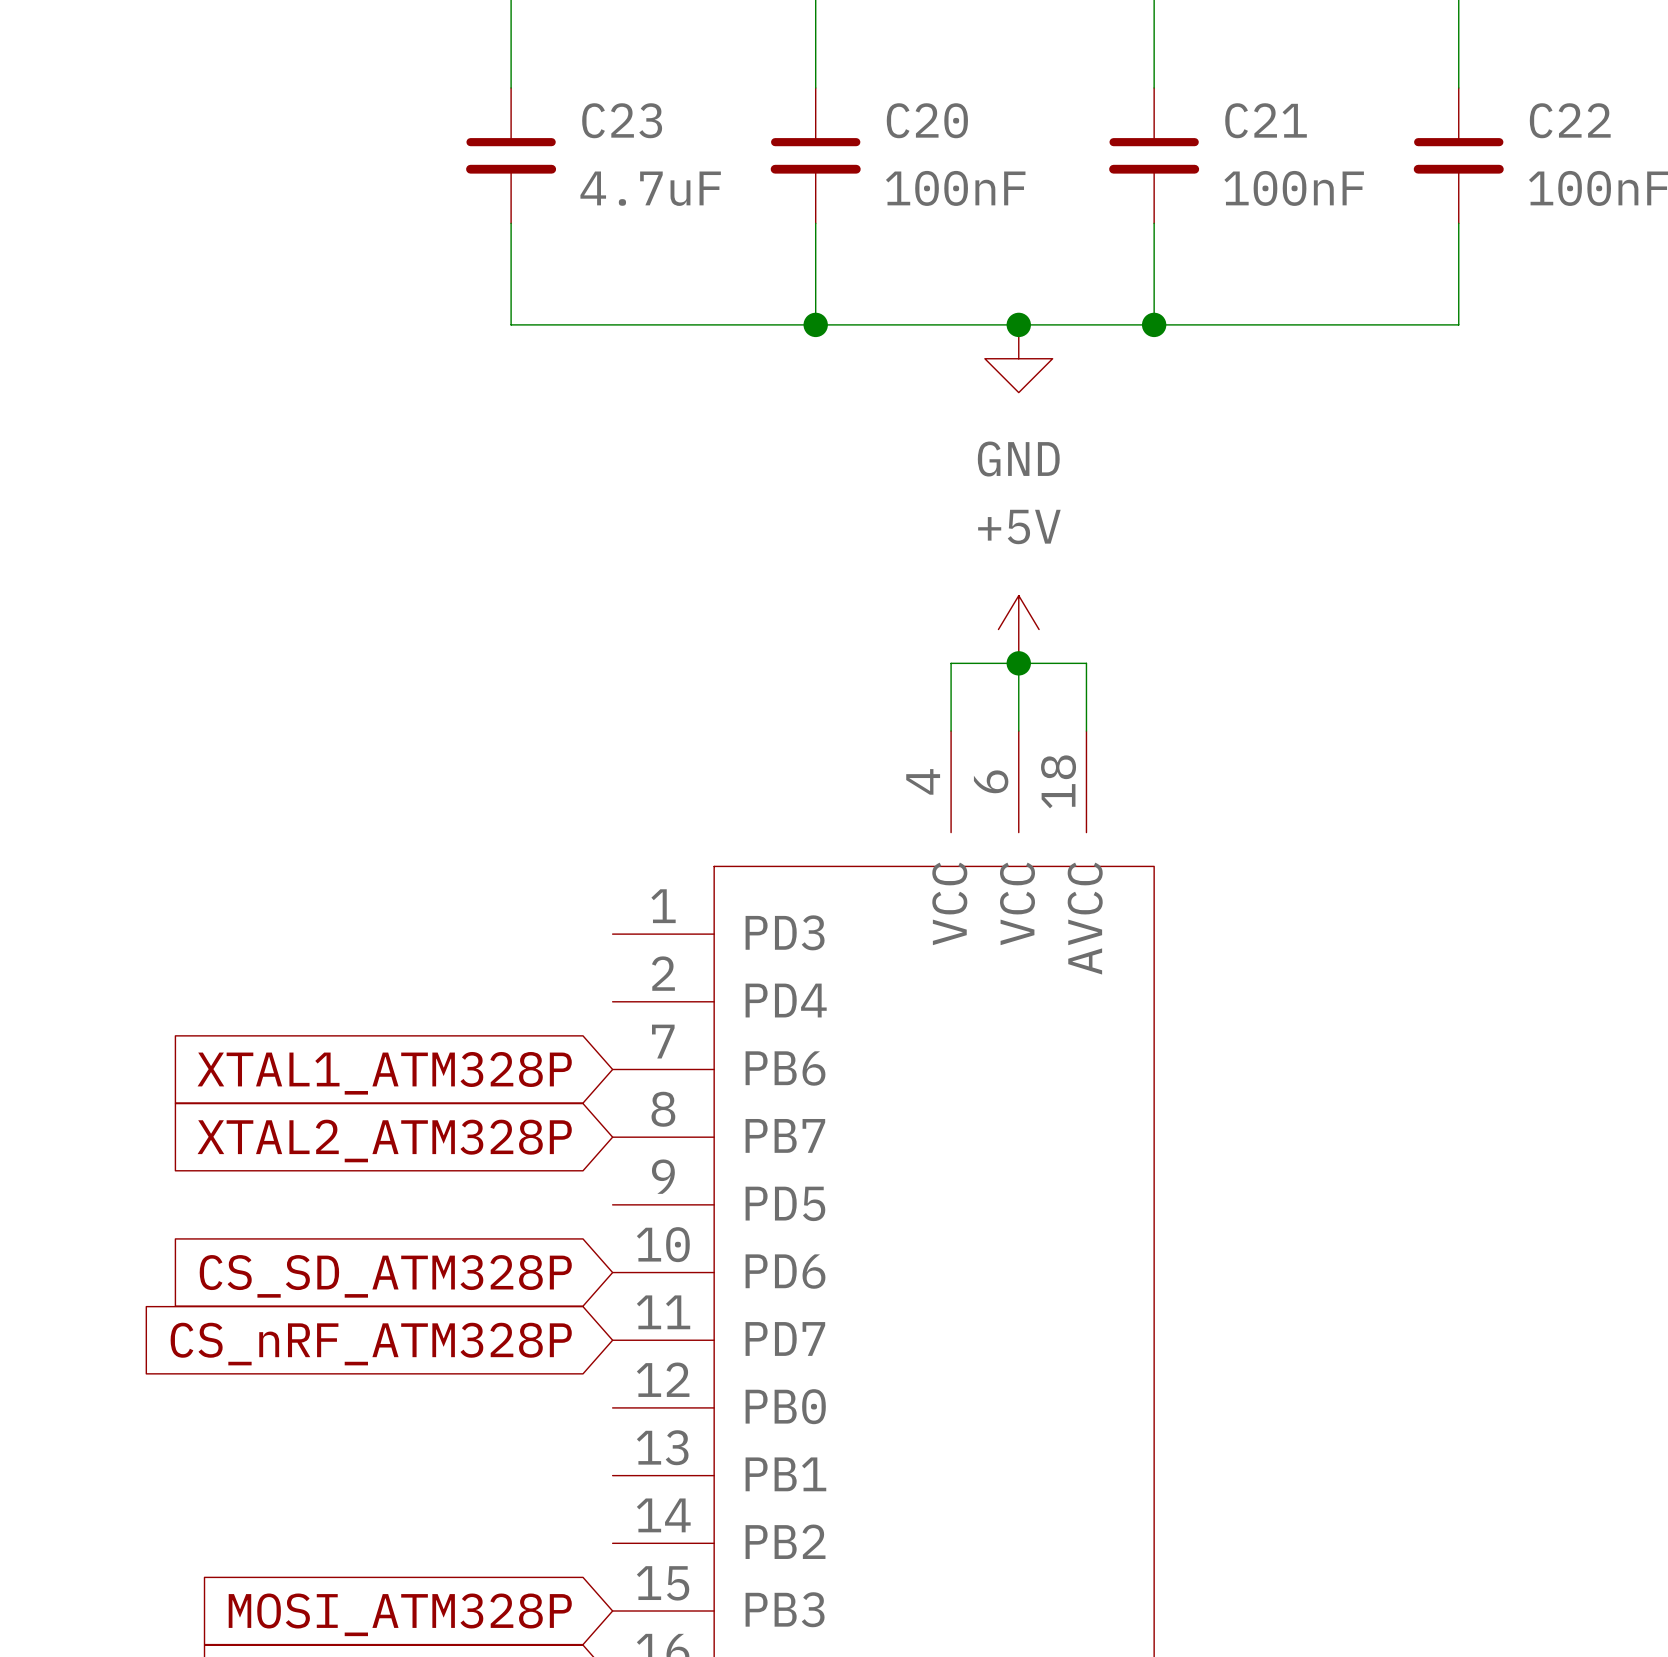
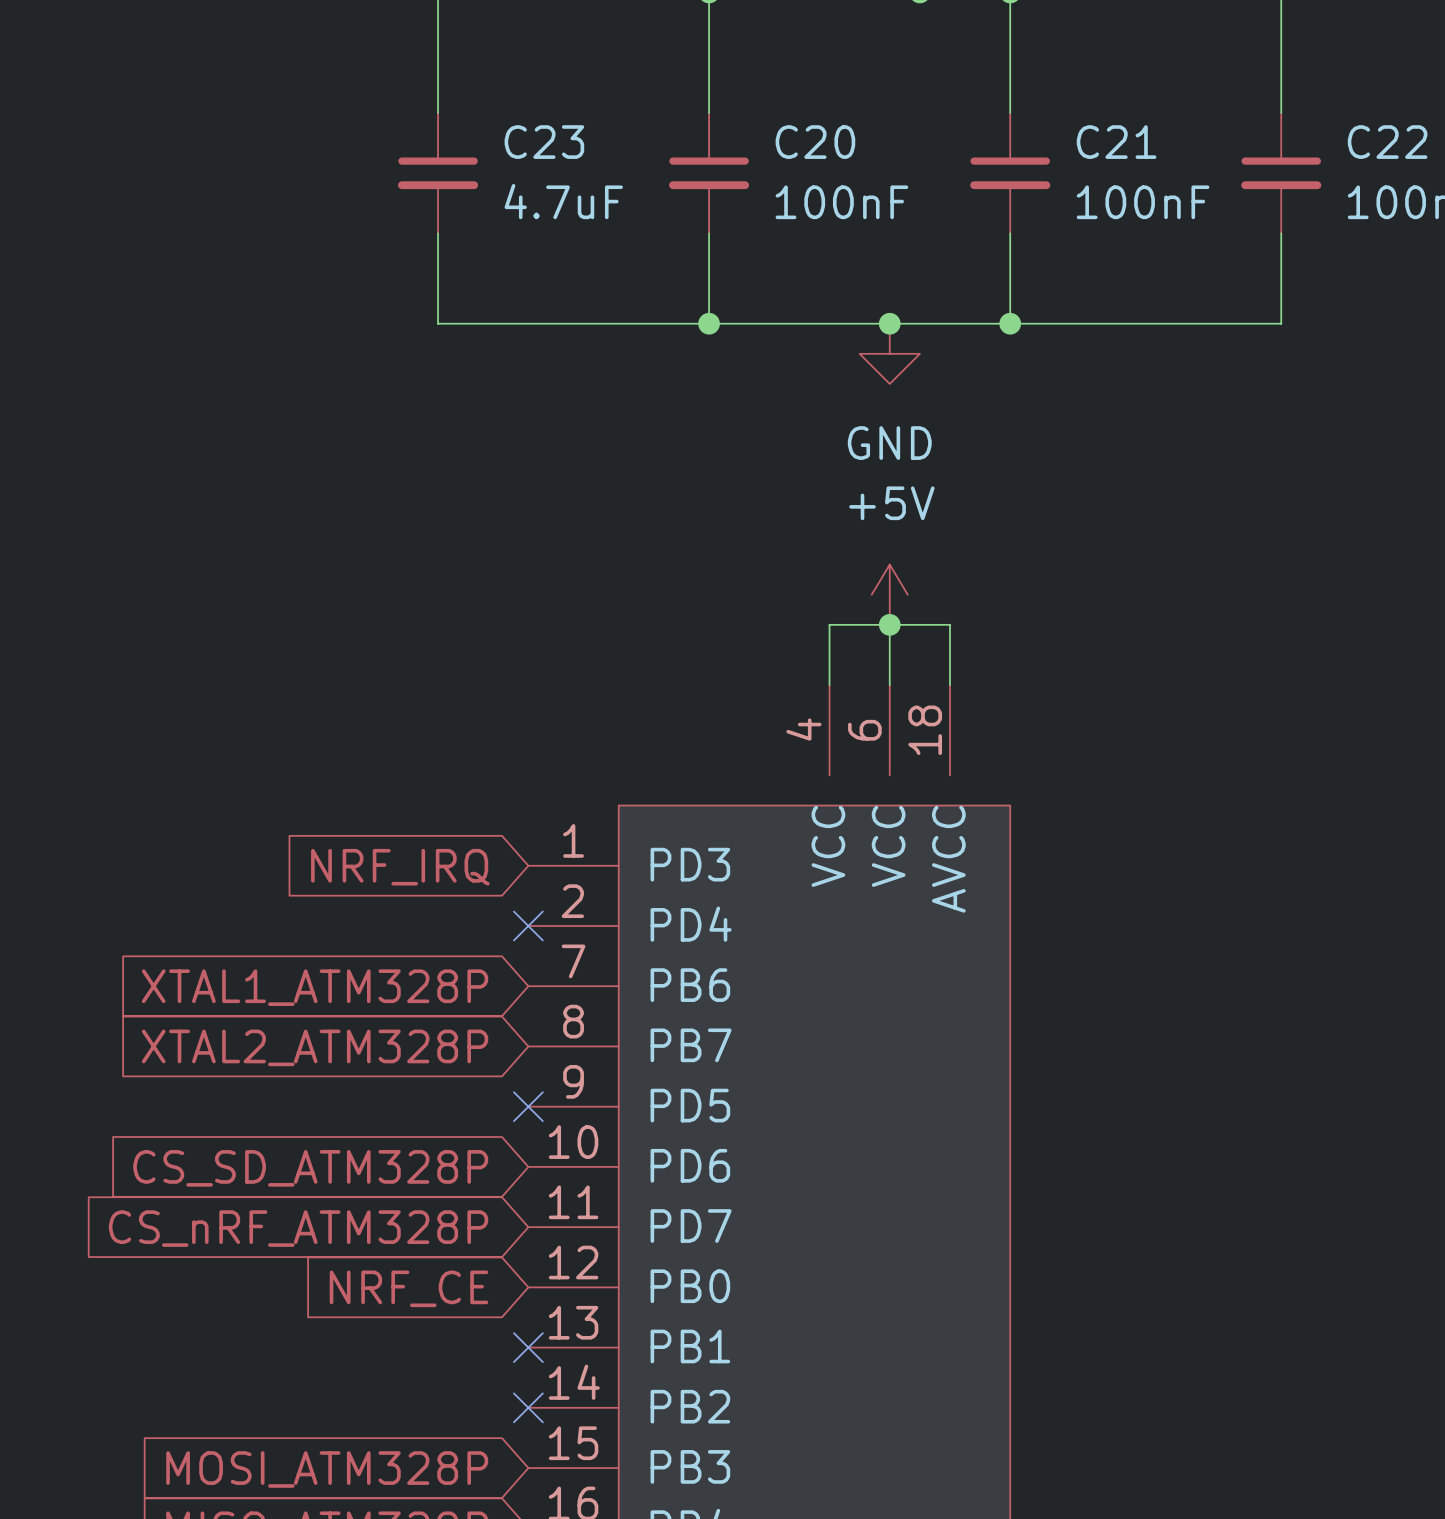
global label: none -> NRF_IRQ (400, 867)
no-connect mark: none -> (528, 926)
no-connect mark: none -> (528, 1106)
global label: none -> NRF_CE (408, 1288)
no-connect mark: none -> (528, 1347)
no-connect mark: none -> (528, 1407)

